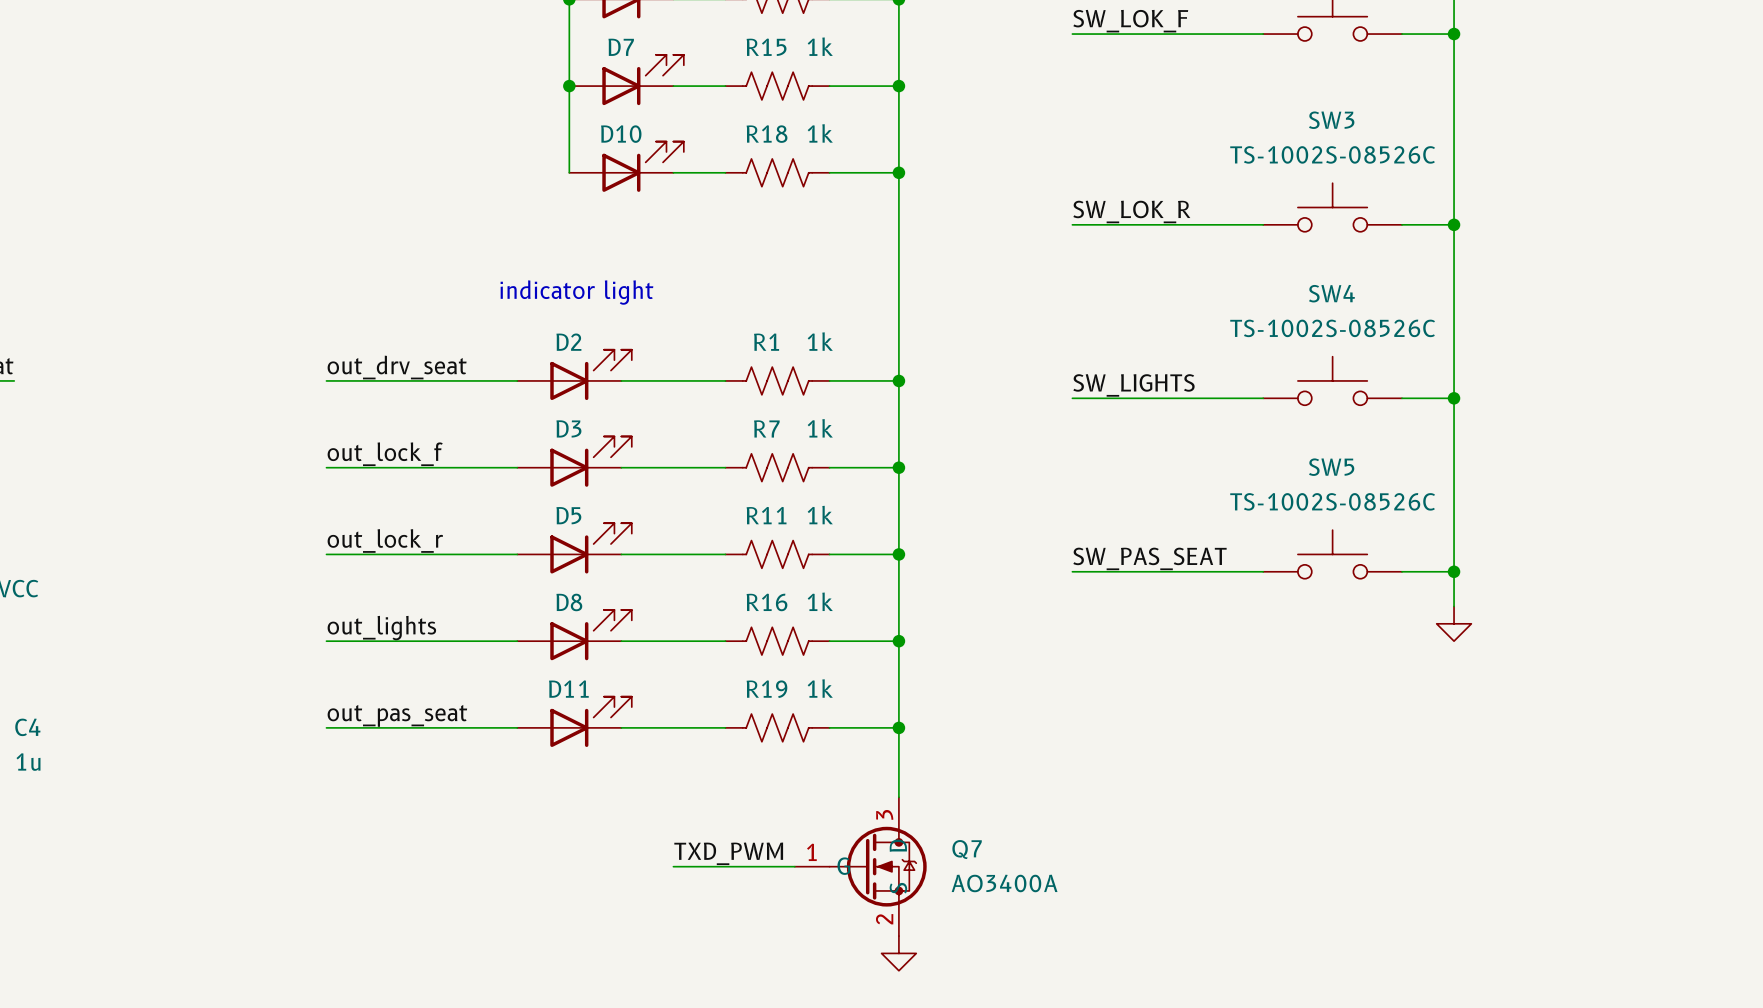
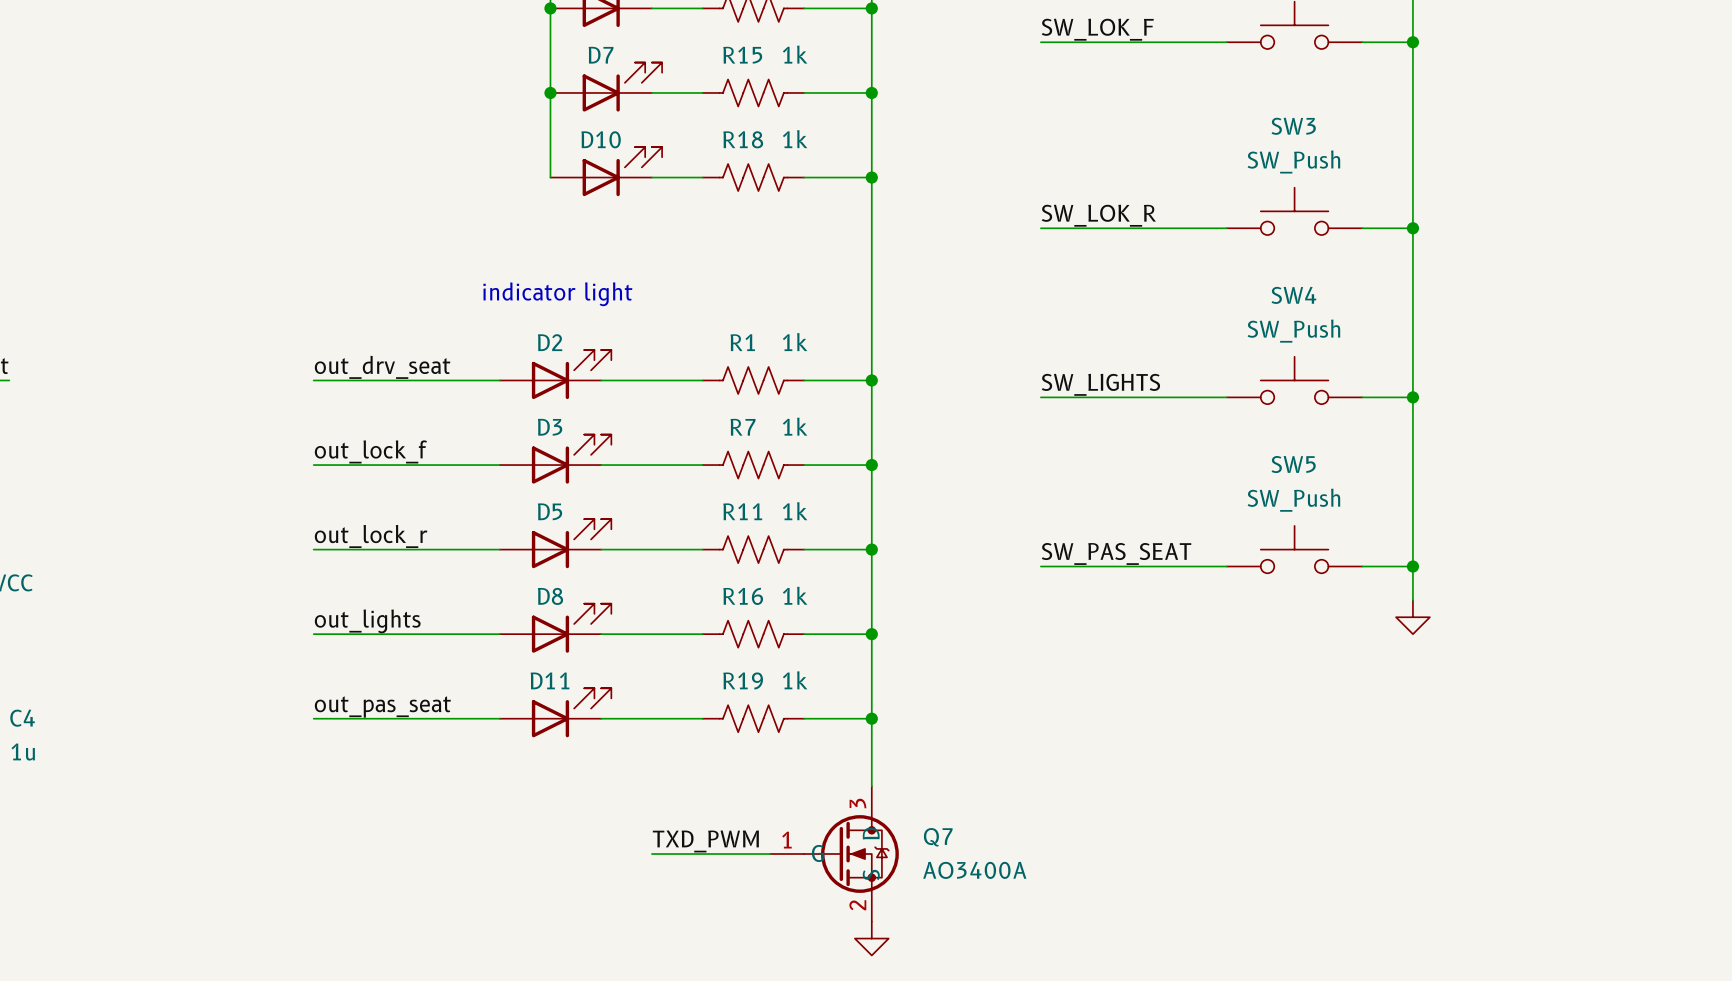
SW3 value: TS-1002S-08526C (1332, 154) -> SW_Push (1293, 161)
SW4 value: TS-1002S-08526C (1332, 328) -> SW_Push (1293, 331)
SW5 value: TS-1002S-08526C (1332, 501) -> SW_Push (1293, 500)

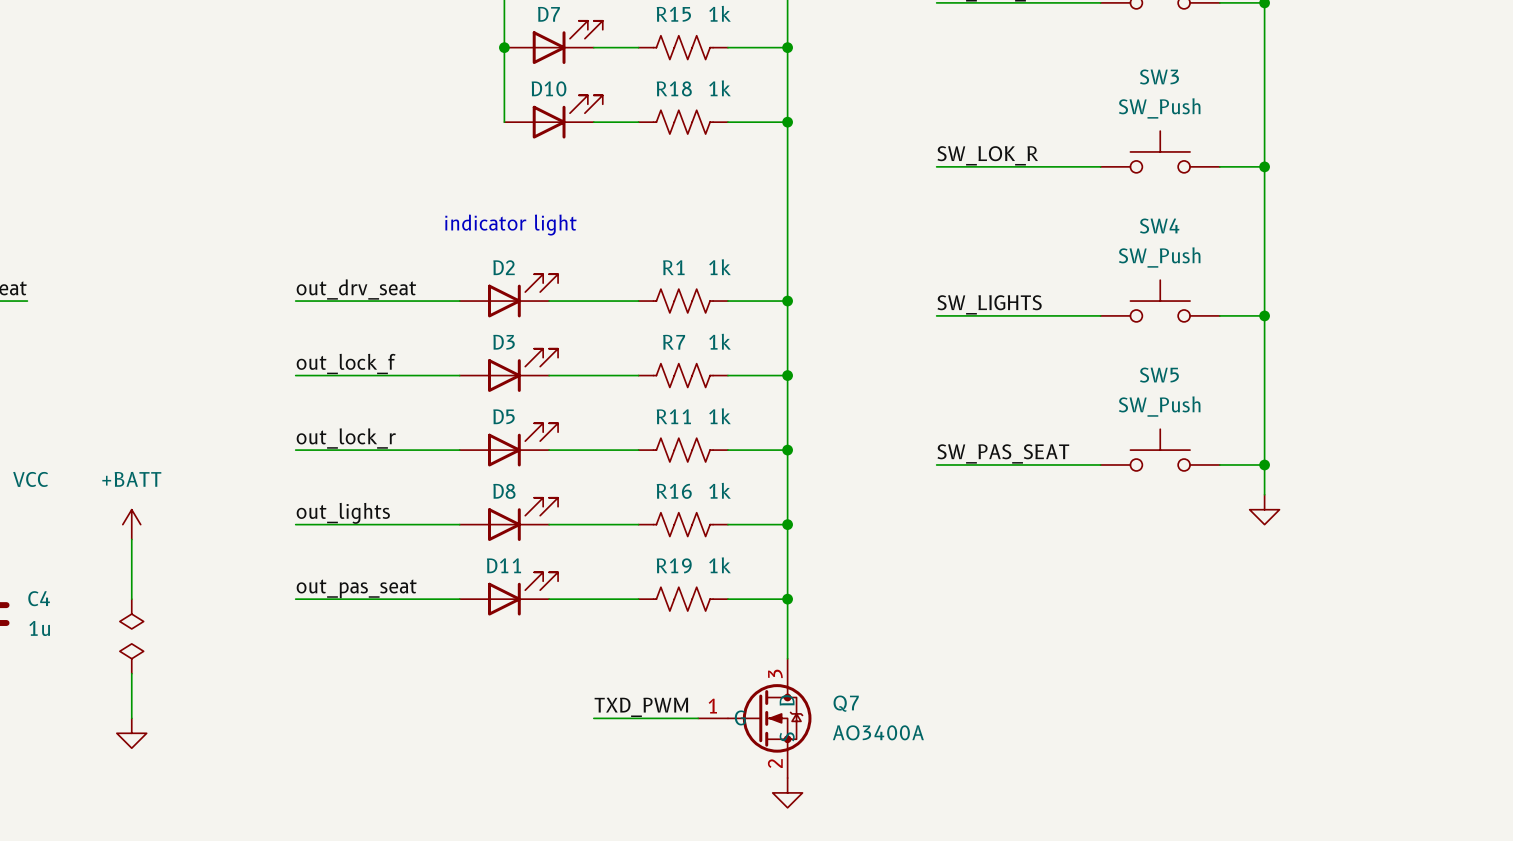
power symbol: none -> +BATT (131, 524)
wire: none -> (131, 539) (131, 599)
power symbol: none -> (131, 614)
power symbol: none -> (131, 658)
wire: none -> (131, 673) (131, 718)
power symbol: none -> (131, 733)

